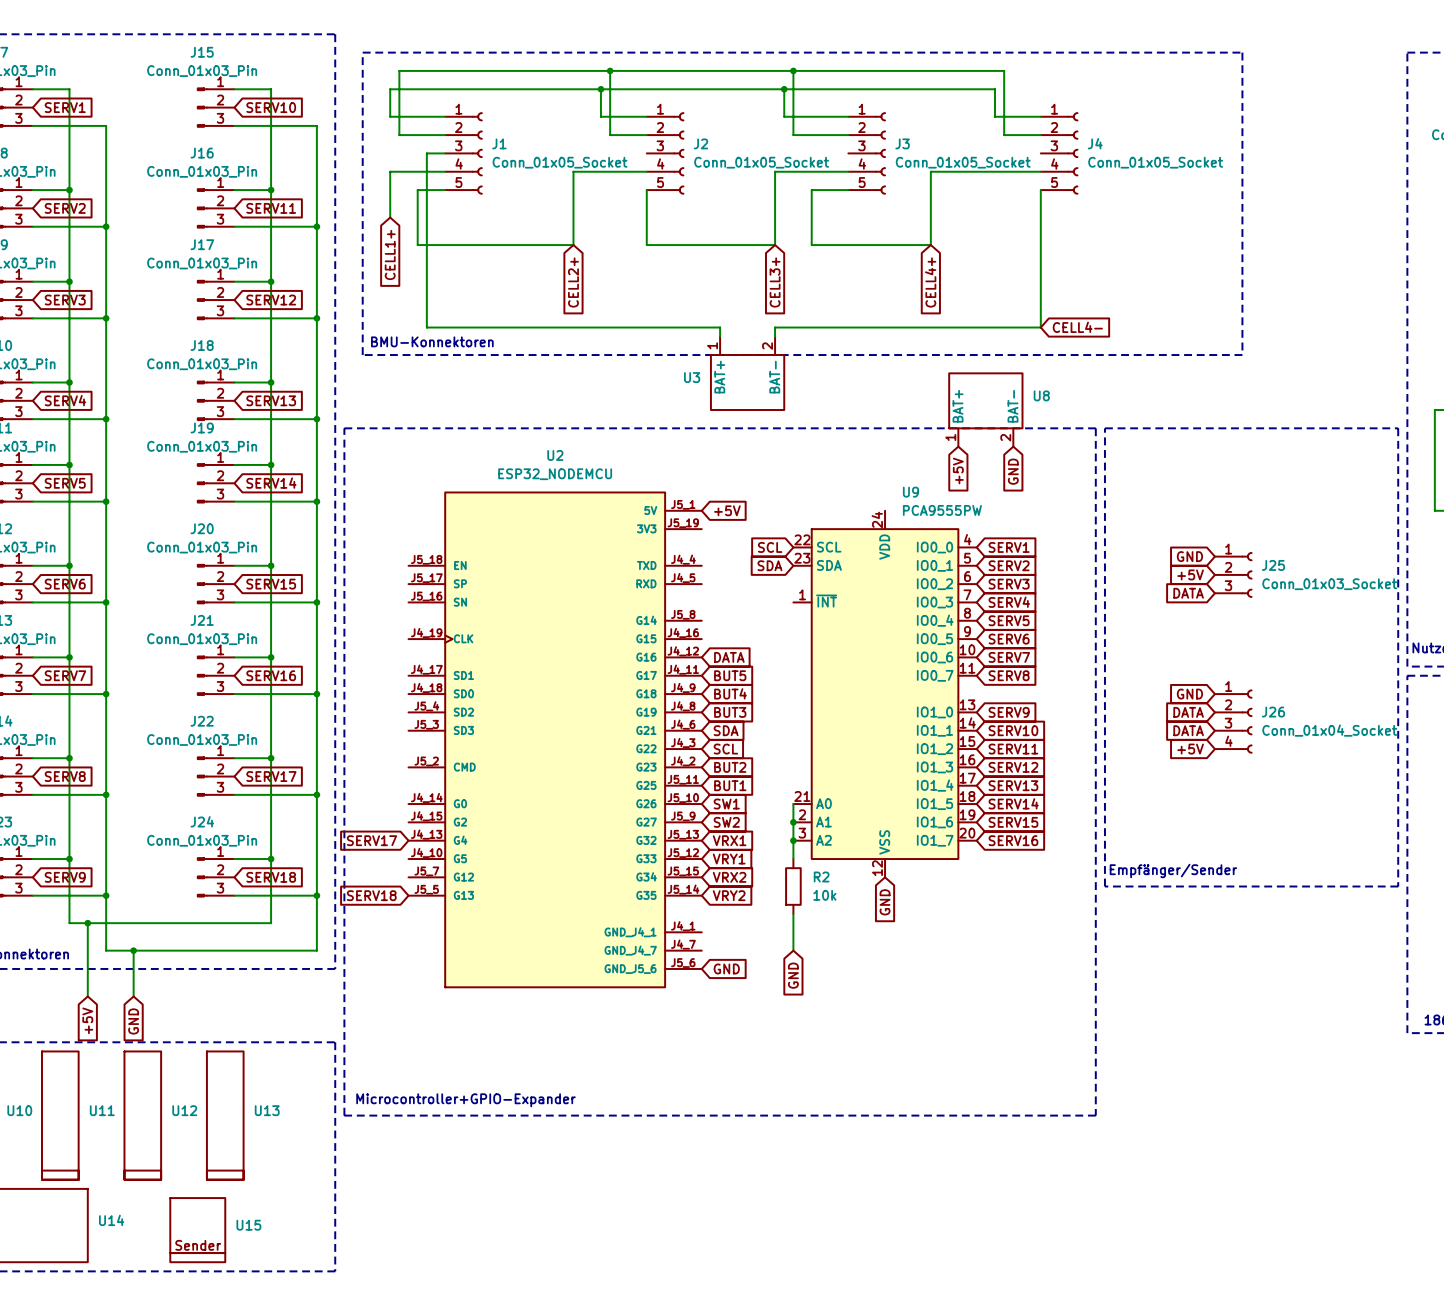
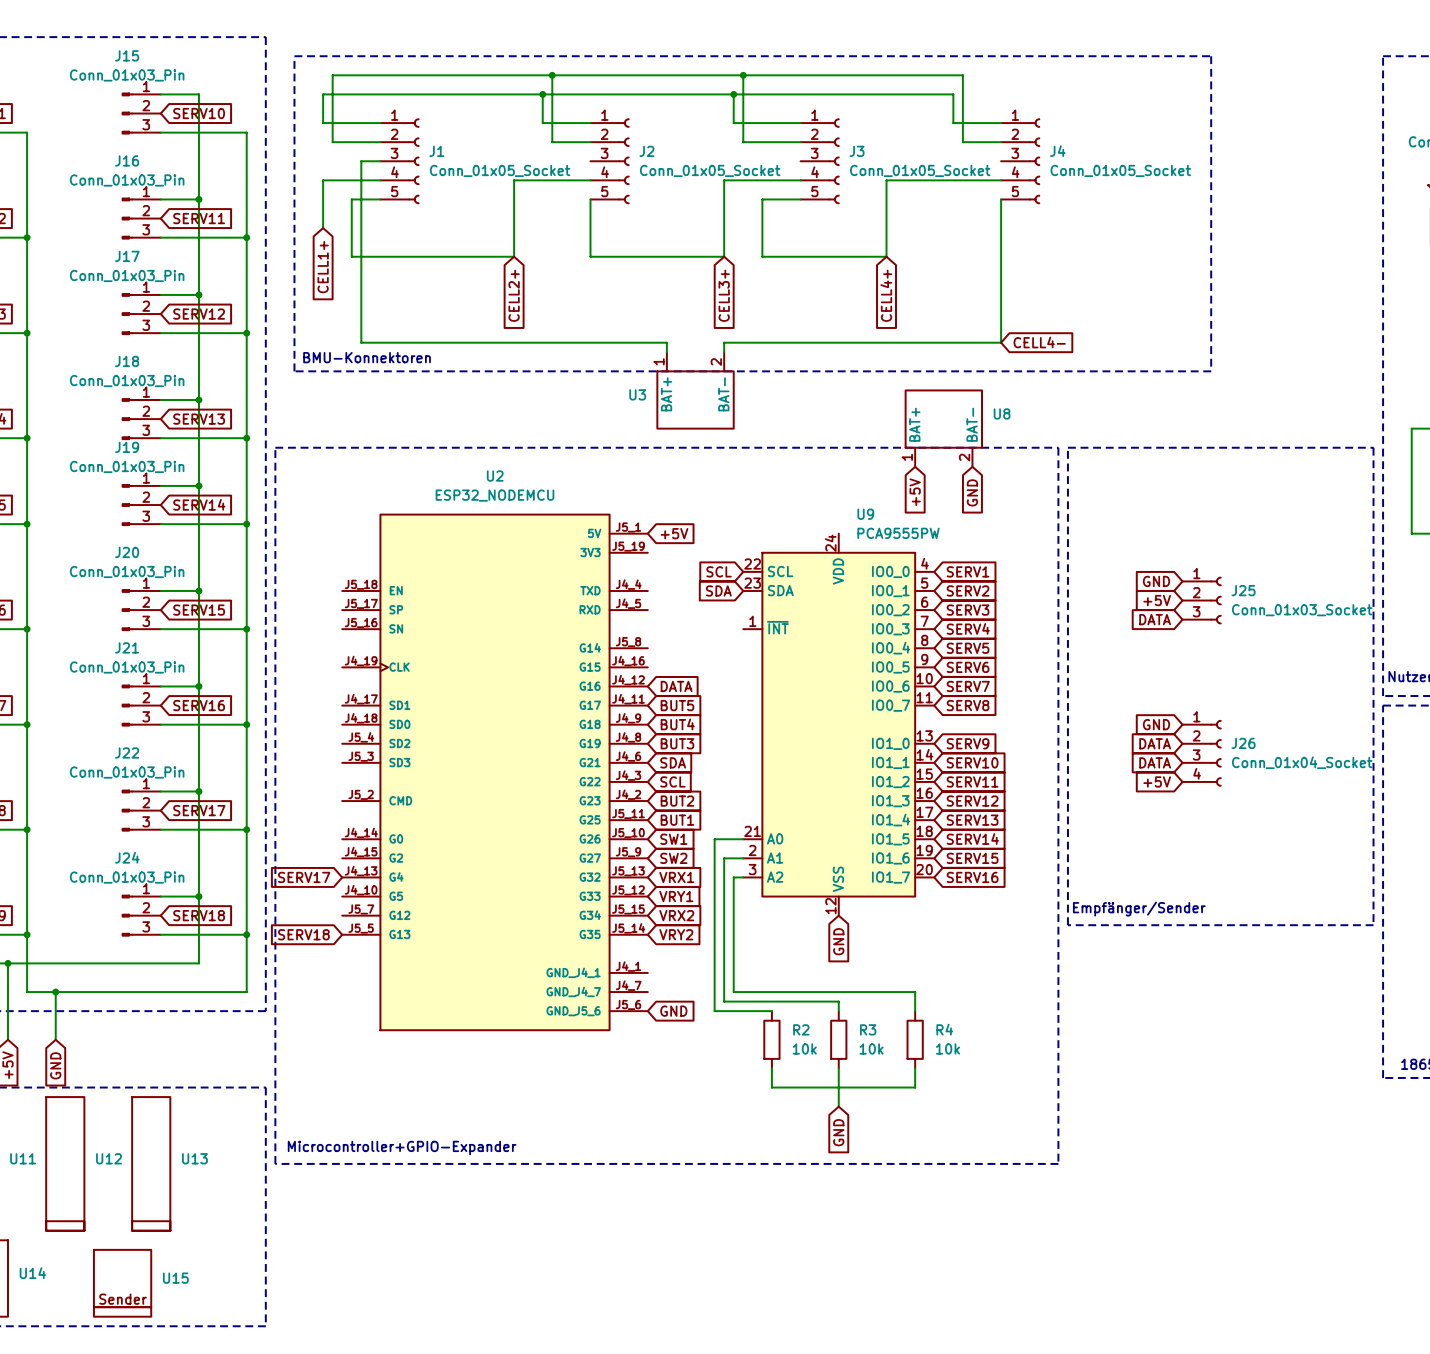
wire: (793, 804) (793, 859) -> (743, 839) (714, 839) (714, 1011) (771, 1011)
wire: none -> (743, 858) (724, 858) (724, 1001) (838, 1001) (838, 1011)
junction: (793, 822) -> none
wire: none -> (743, 877) (733, 877) (733, 992) (915, 992) (915, 1011)
junction: (793, 840) -> none
R2 position: (793, 886) -> (771, 1039)
wire: (793, 913) (793, 950) -> (838, 1068) (838, 1106)
global label position: GND (793, 975) -> GND (838, 1132)
R3: none -> 10k (838, 1039)
R4: none -> 10k (915, 1039)
wire: none -> (771, 1068) (771, 1087) (915, 1087) (915, 1068)

